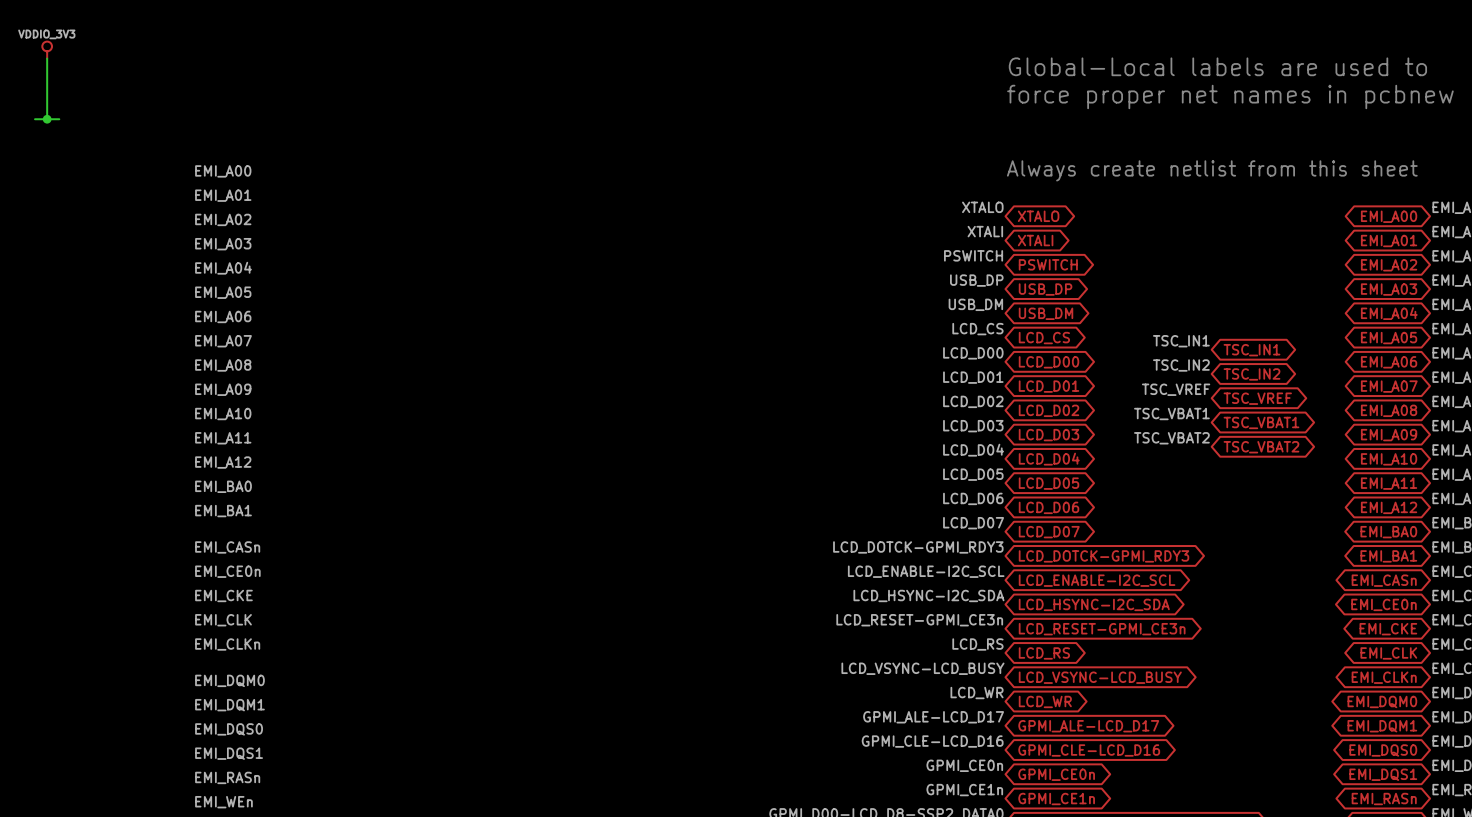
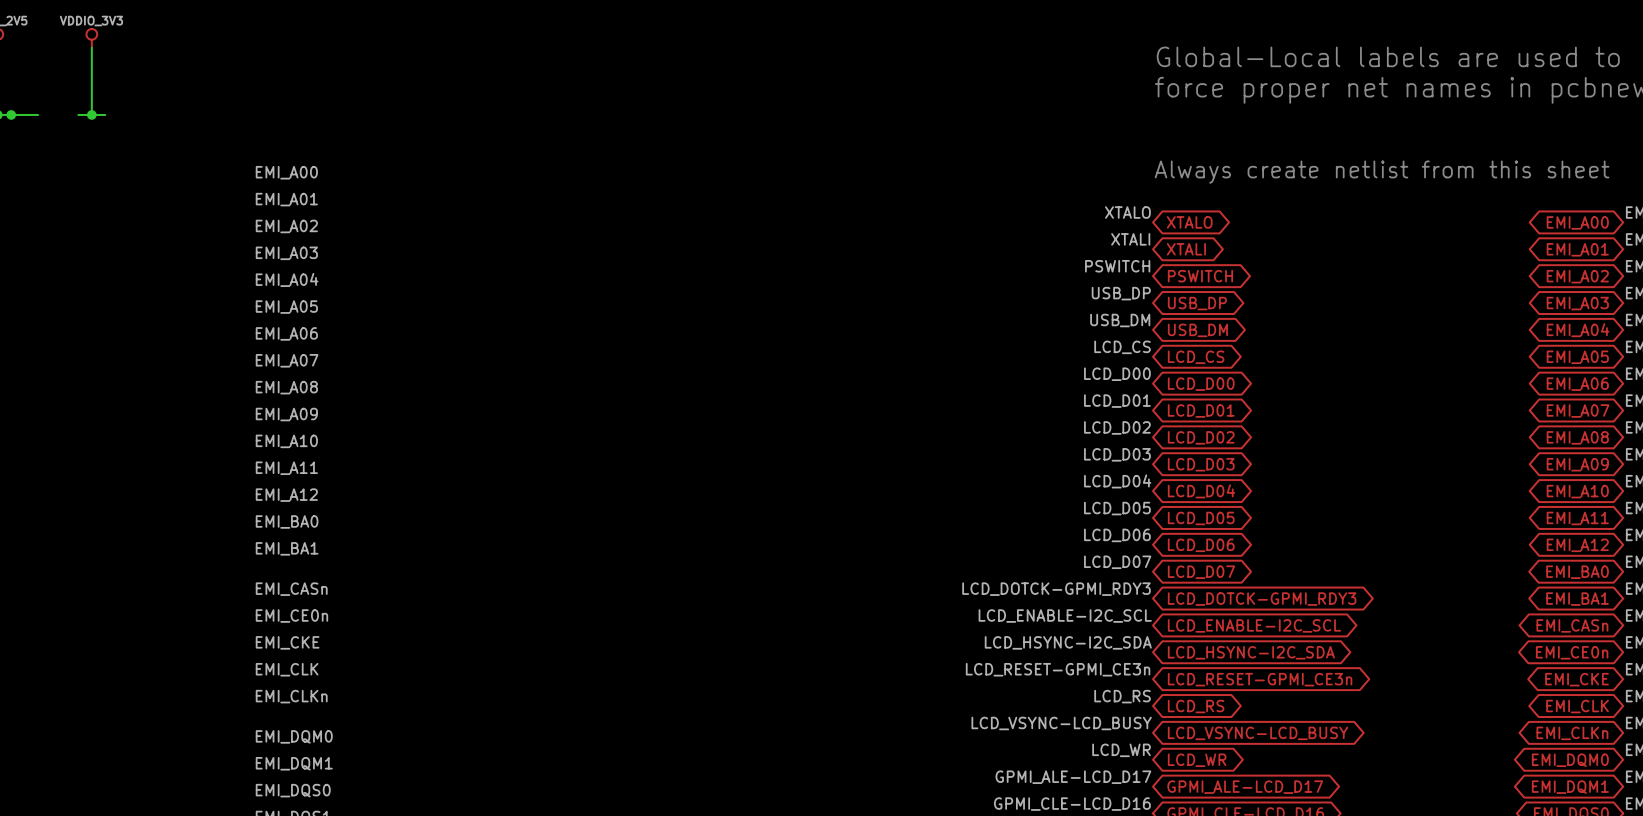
label: TSC_IN1 (1181, 341) -> none
global label: TSC_IN1 (1251, 350) -> none
label: TSC_IN2 (1181, 365) -> none
global label: TSC_IN2 (1251, 374) -> none
label: TSC_VREF (1176, 389) -> none
global label: TSC_VREF (1257, 398) -> none
label: TSC_VBAT1 (1171, 414) -> none
global label: TSC_VBAT1 (1261, 422) -> none
label: TSC_VBAT2 (1171, 438) -> none
global label: TSC_VBAT2 (1261, 447) -> none

